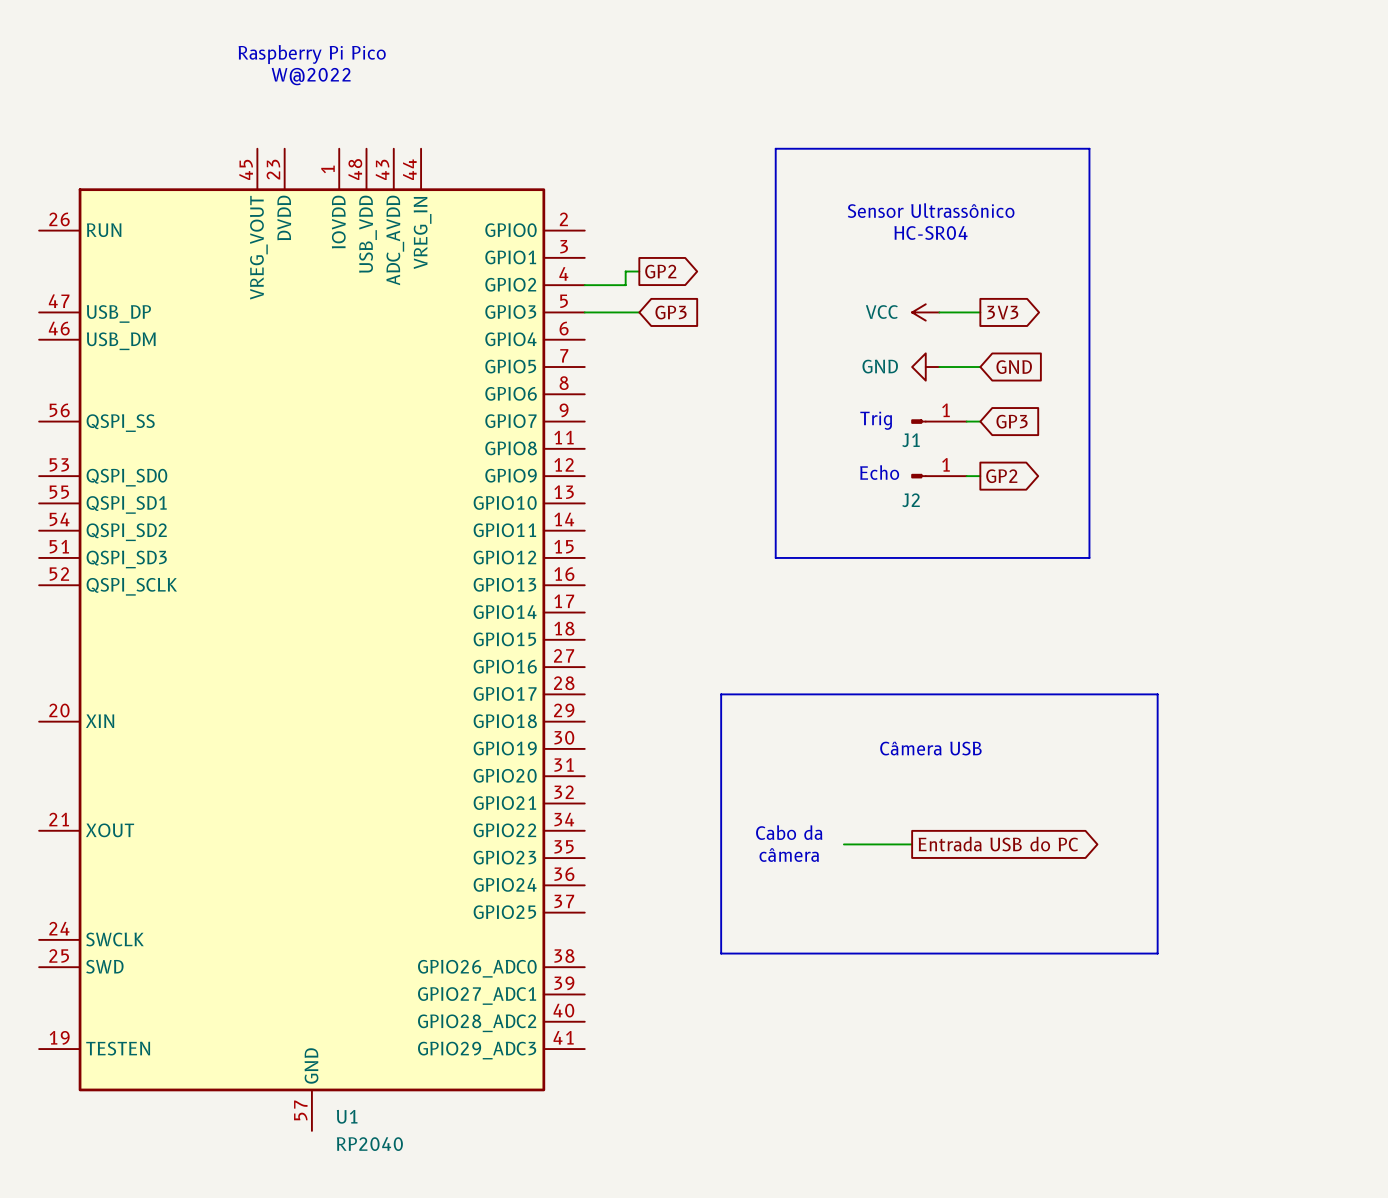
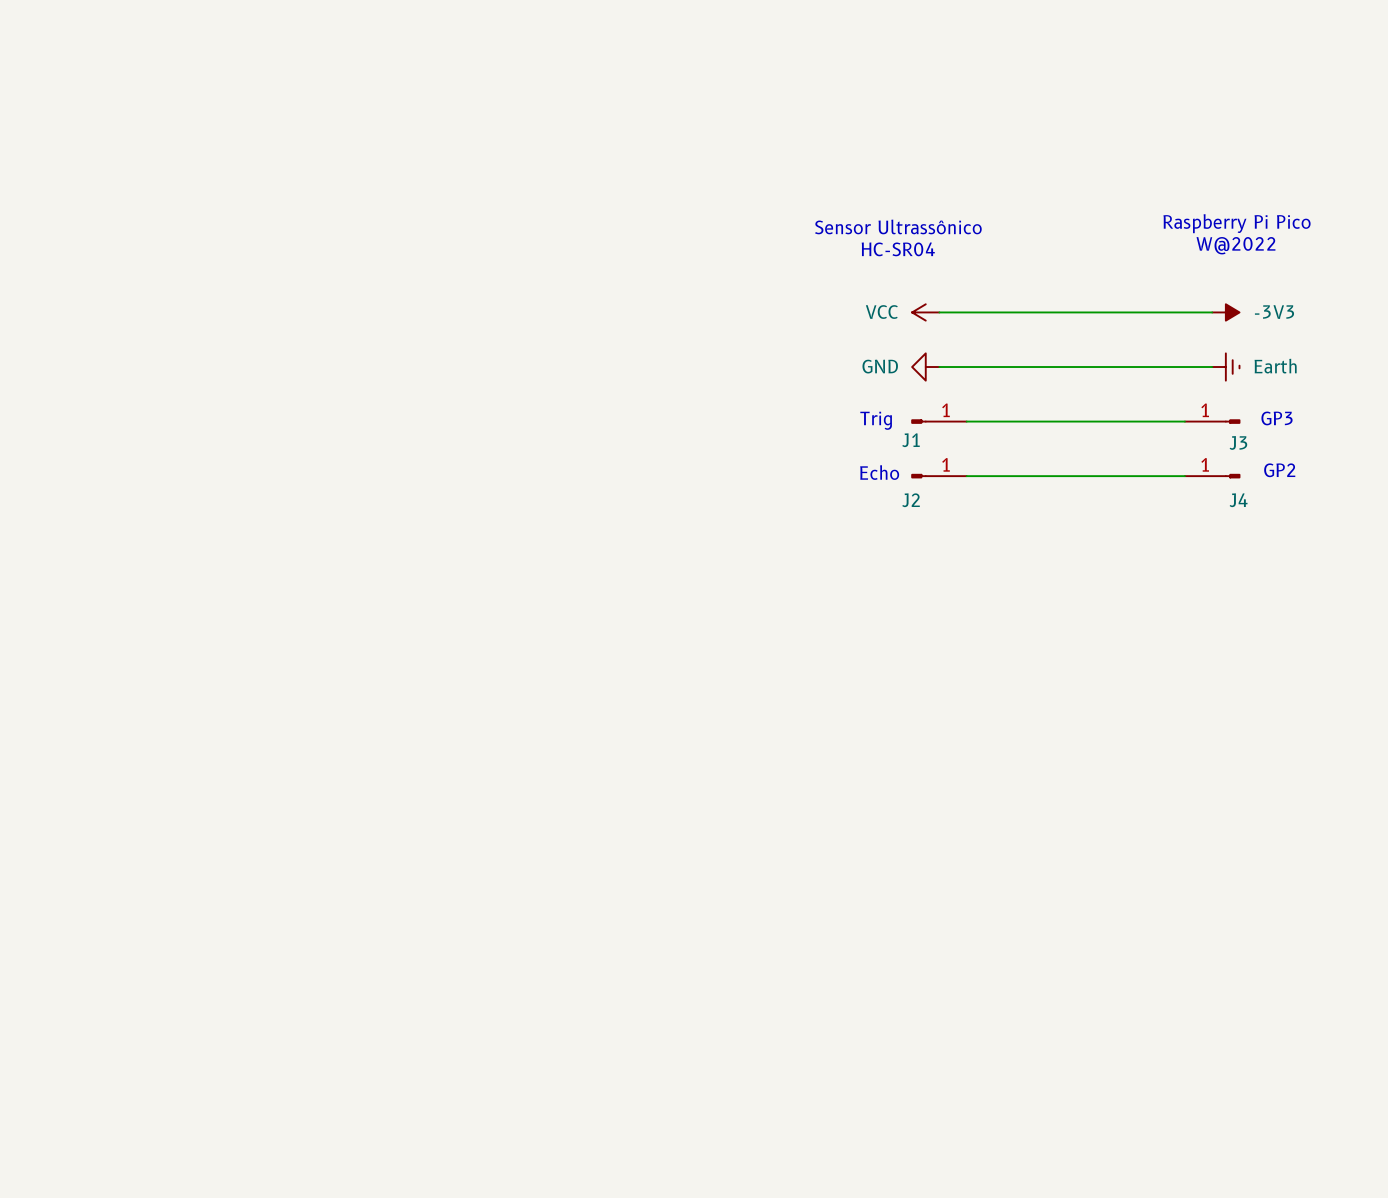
text: Raspberry Pi Pico (312, 54) -> none
text: W@2022 (311, 76) -> none
line: (775, 148) (1089, 148) (1089, 557) (775, 557) (775, 148) -> none
text position: Sensor Ultrassônico (931, 210) -> Sensor Ultrassônico (898, 226)
text: none -> Raspberry Pi Pico (1237, 223)
text position: HC-SR04 (931, 233) -> HC-SR04 (898, 249)
text: none -> W@2022 (1235, 245)
wire: (639, 271) (625, 271) (625, 285) (584, 285) -> none
global label: GP2 (660, 271) -> none
wire: (584, 312) (639, 312) -> none
global label: GP3 (671, 312) -> none
wire: none -> (980, 312) (1212, 312)
global label: 3V3 (1002, 312) -> none
power symbol: none -> -3V3 (1225, 312)
wire: none -> (980, 367) (1212, 367)
global label: GND (1014, 367) -> none
power symbol: none -> Earth (1225, 367)
text: none -> GP3 (1277, 418)
wire: none -> (980, 421) (1184, 421)
global label: GP3 (1012, 421) -> none
J3: none -> (1212, 421)
text: none -> GP2 (1279, 470)
wire: none -> (980, 476) (1184, 476)
global label: GP2 (1001, 476) -> none
J4: none -> (1212, 476)
U1: RP2040 (311, 639) -> none
line: (721, 694) (1157, 694) (1157, 953) (721, 953) (721, 694) -> none
text: Câmera USB (930, 748) -> none
text: Cabo da (789, 832) -> none
wire: (843, 844) (912, 844) -> none
global label: Entrada USB do PC (998, 844) -> none
text: câmera (789, 855) -> none

